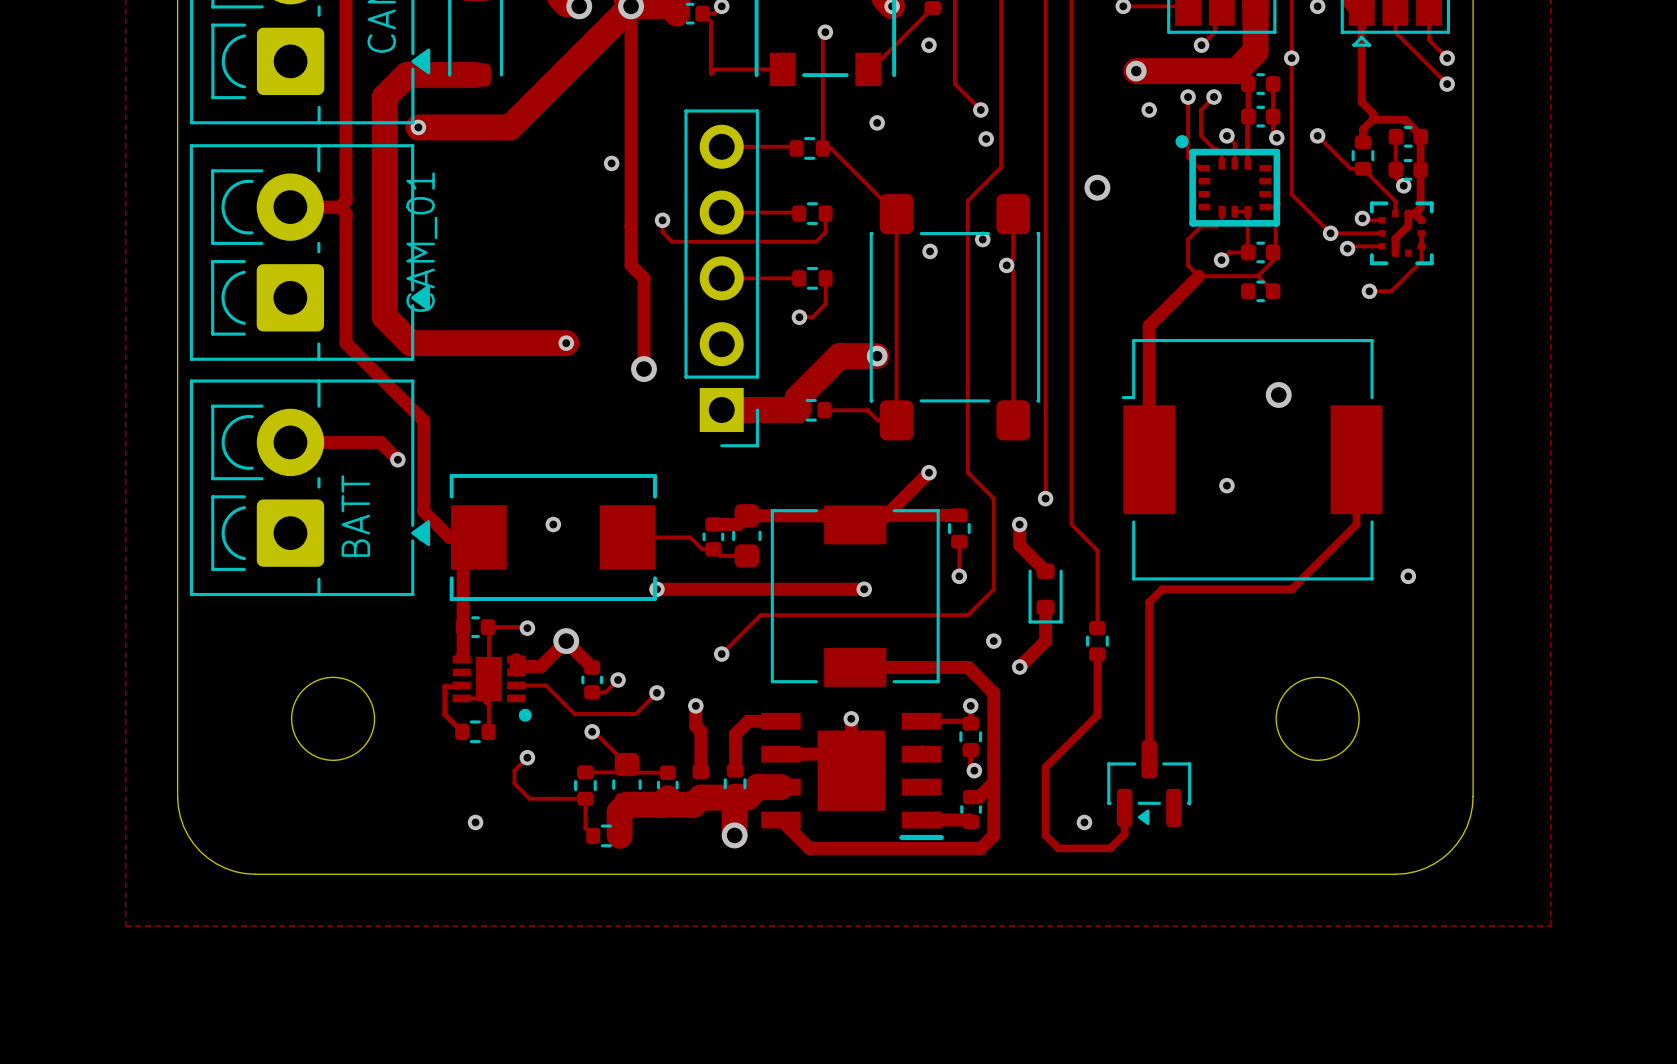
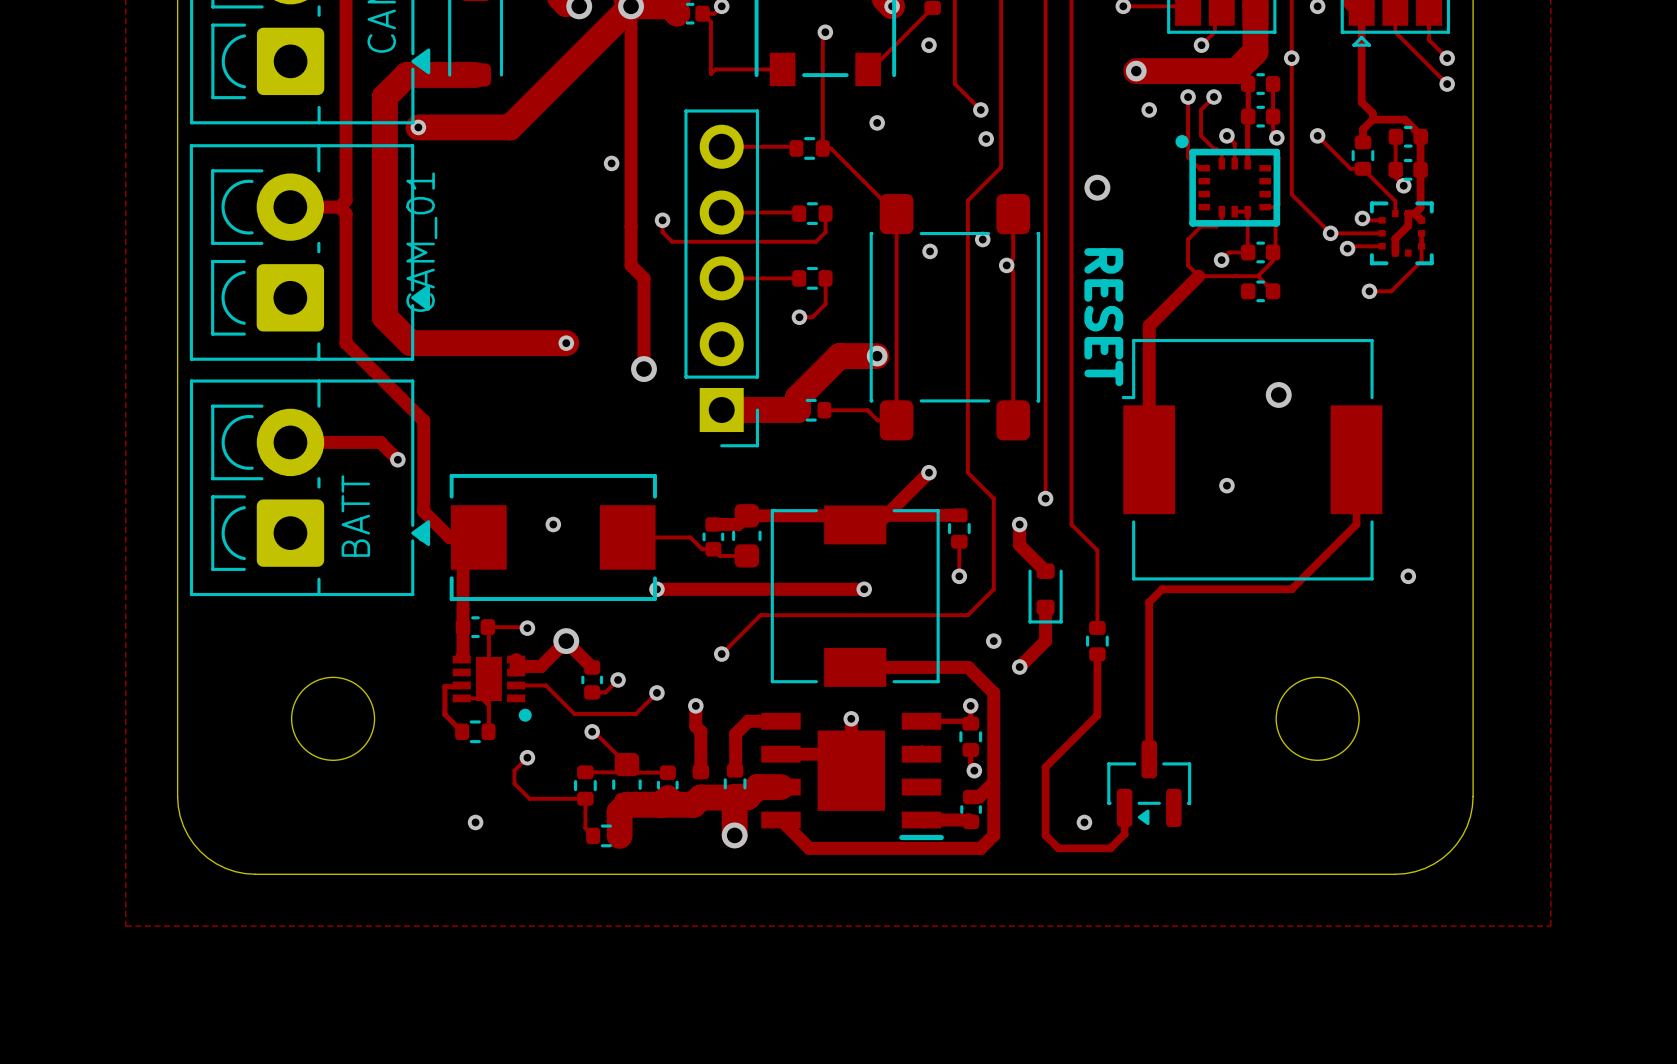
text: none -> RESET (1103, 317)

